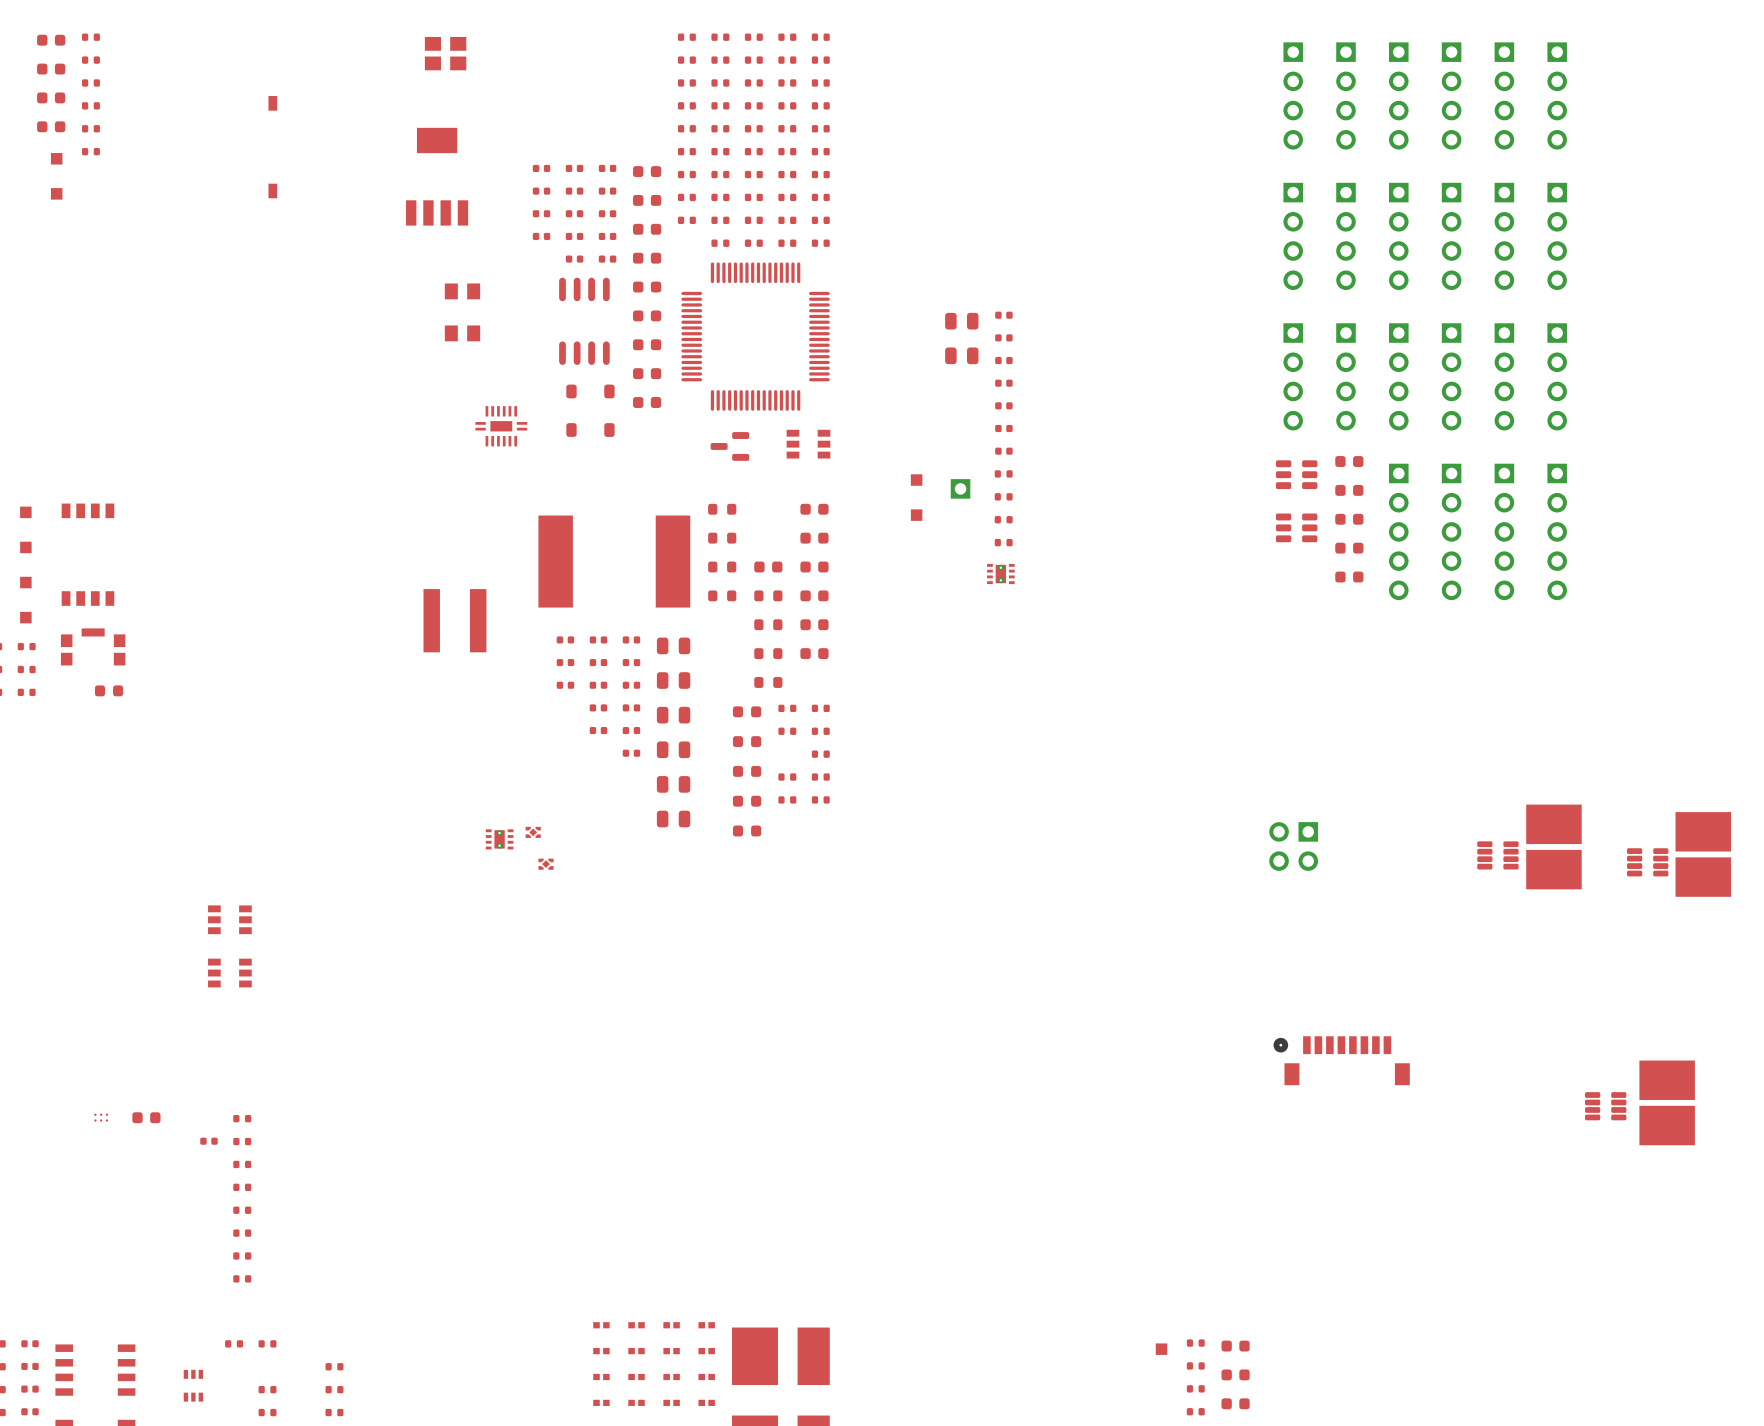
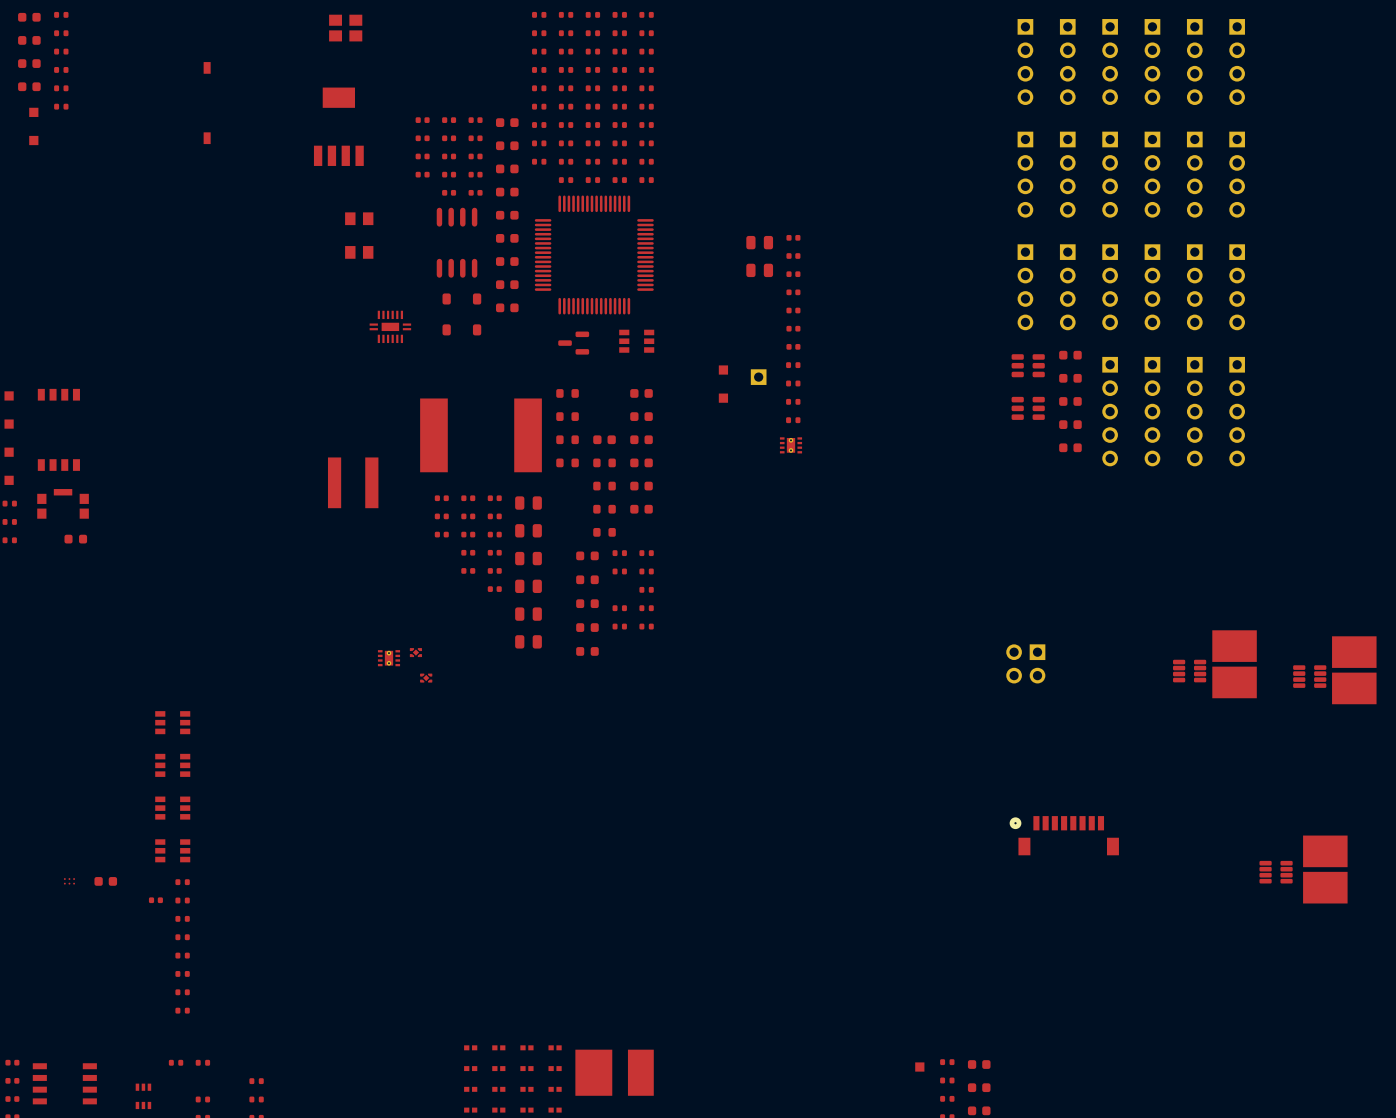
part: none -> (172, 808)
part: none -> (172, 850)

